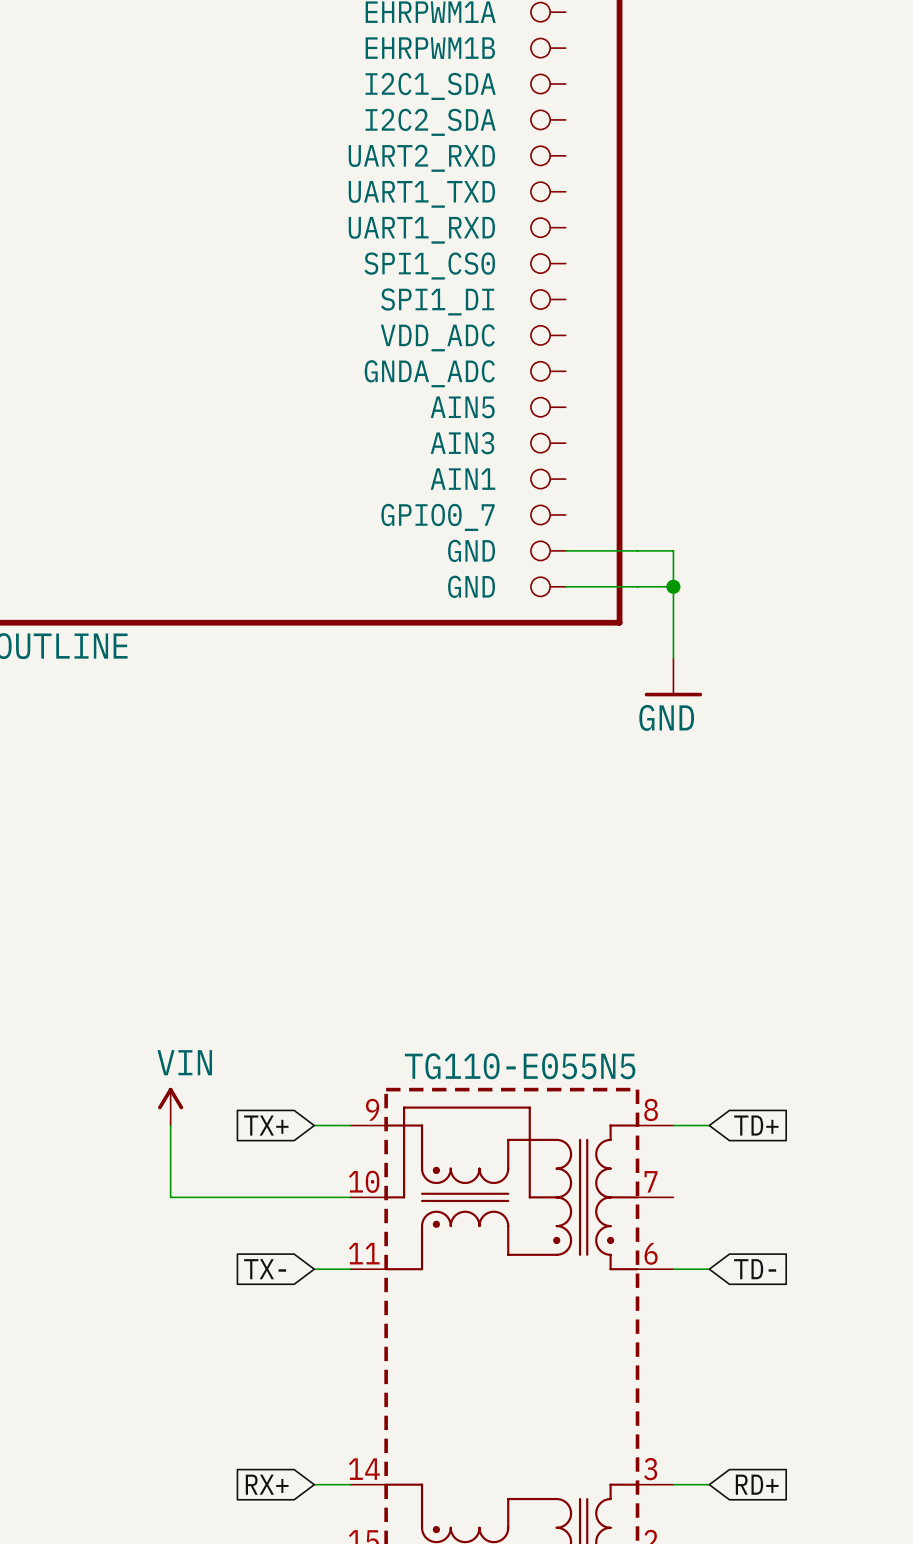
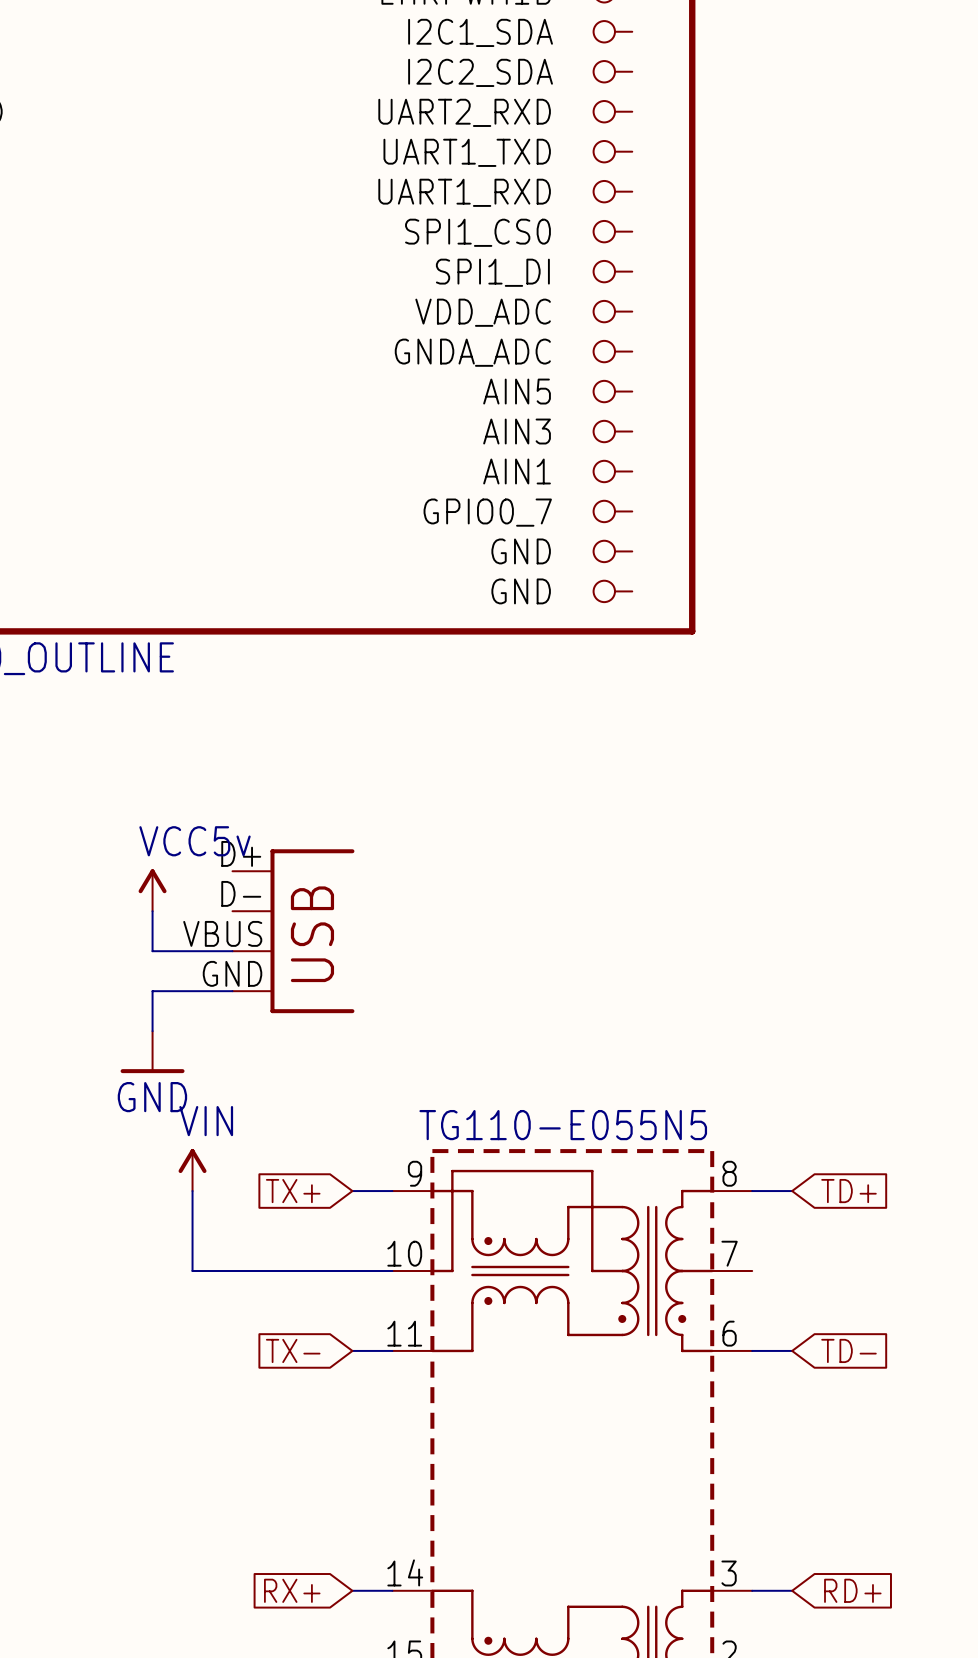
wire: (565, 550) (673, 550) (673, 658) -> none
wire: (565, 586) (673, 586) -> none
junction: (673, 586) -> none
power symbol: GND (673, 677) -> none
power symbol: none -> VCC5v (152, 890)
wire: none -> (152, 911) (152, 951) (232, 951)
part: none -> (293, 931)
wire: none -> (232, 991) (152, 991) (152, 1031)
power symbol: none -> GND (152, 1052)

